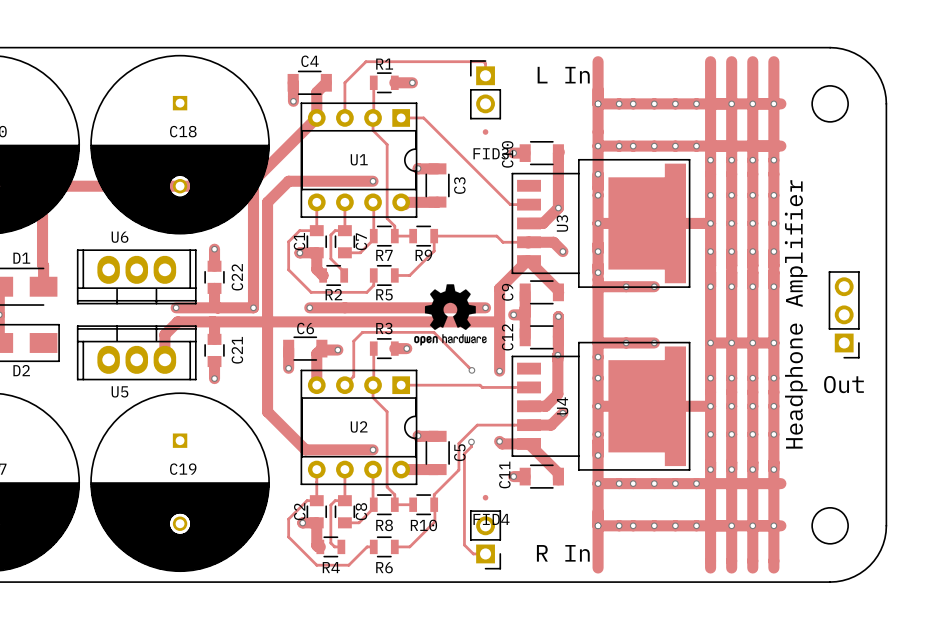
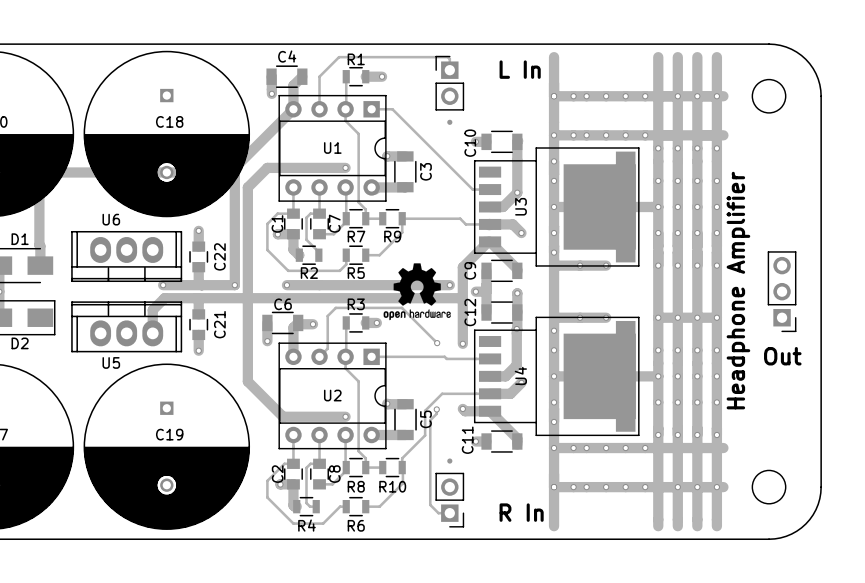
FID3 name: FID3 (491, 153) -> none
FID4 name: FID4 (491, 519) -> none

